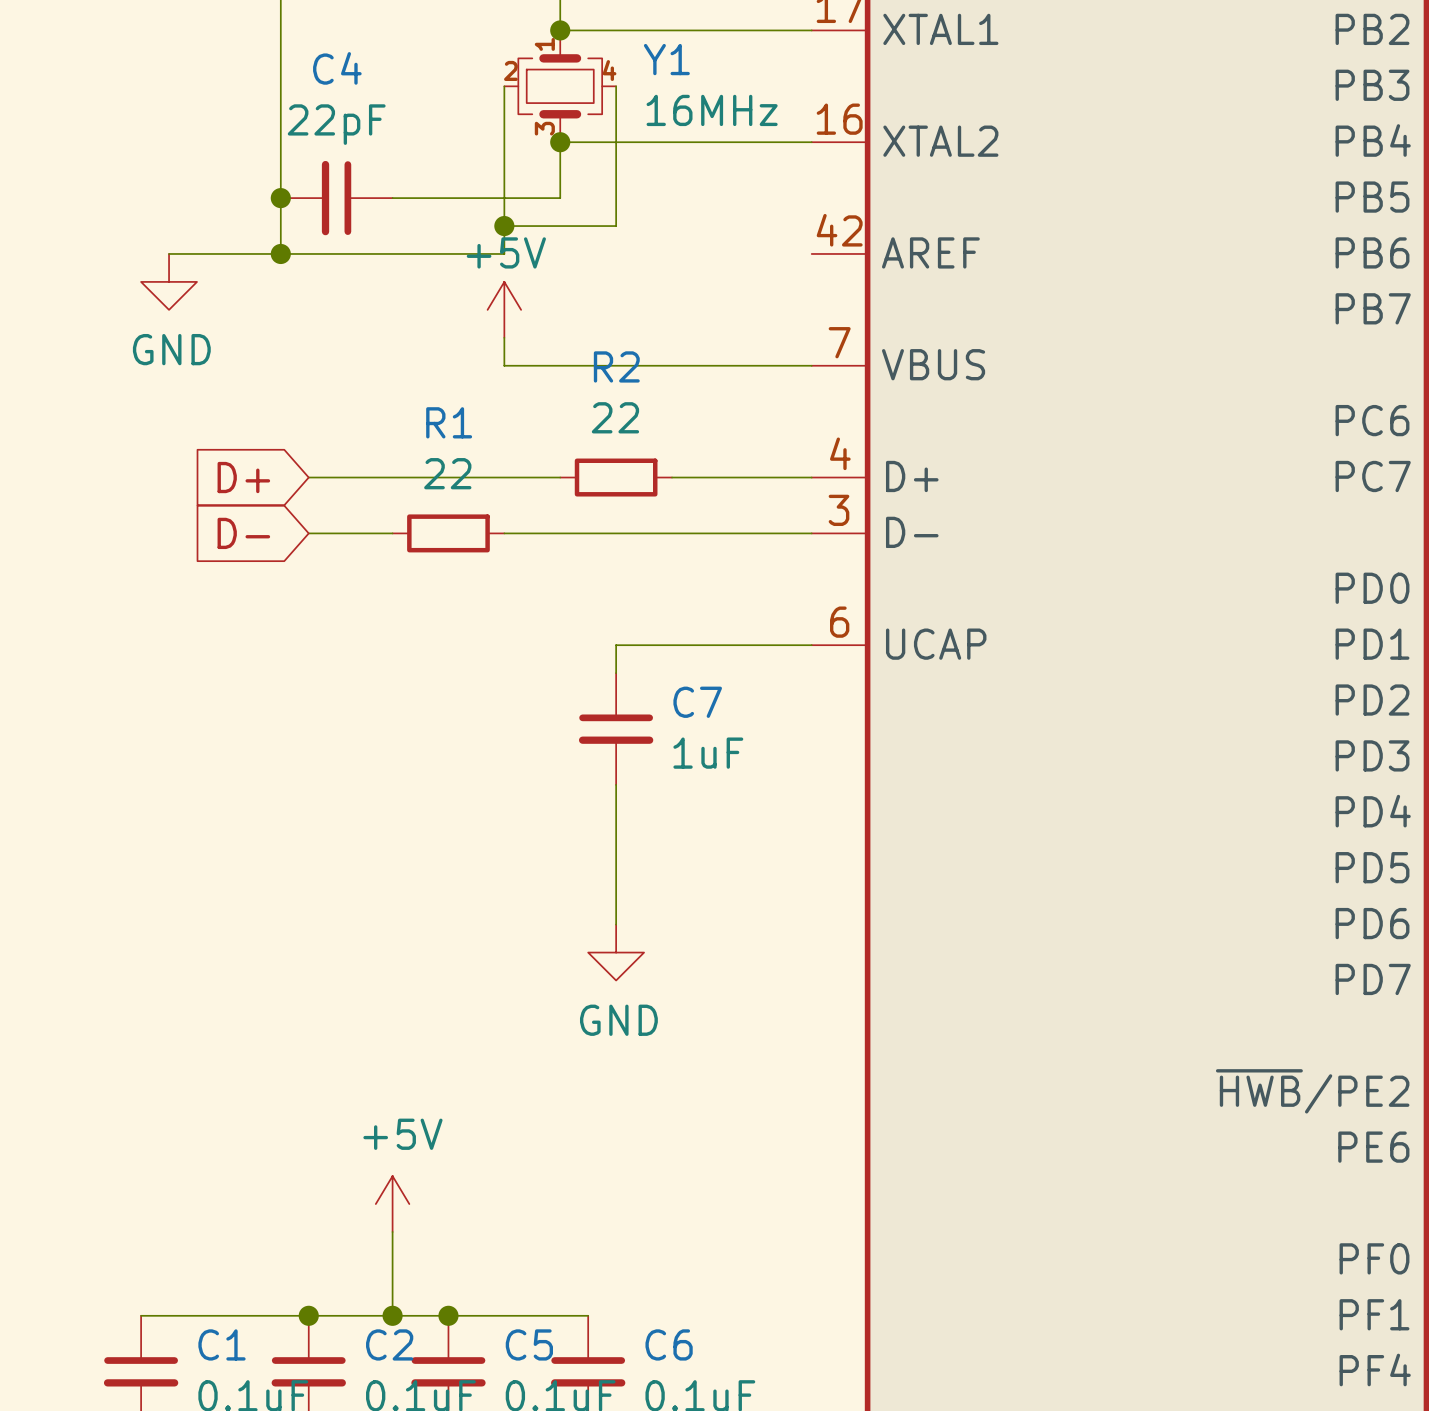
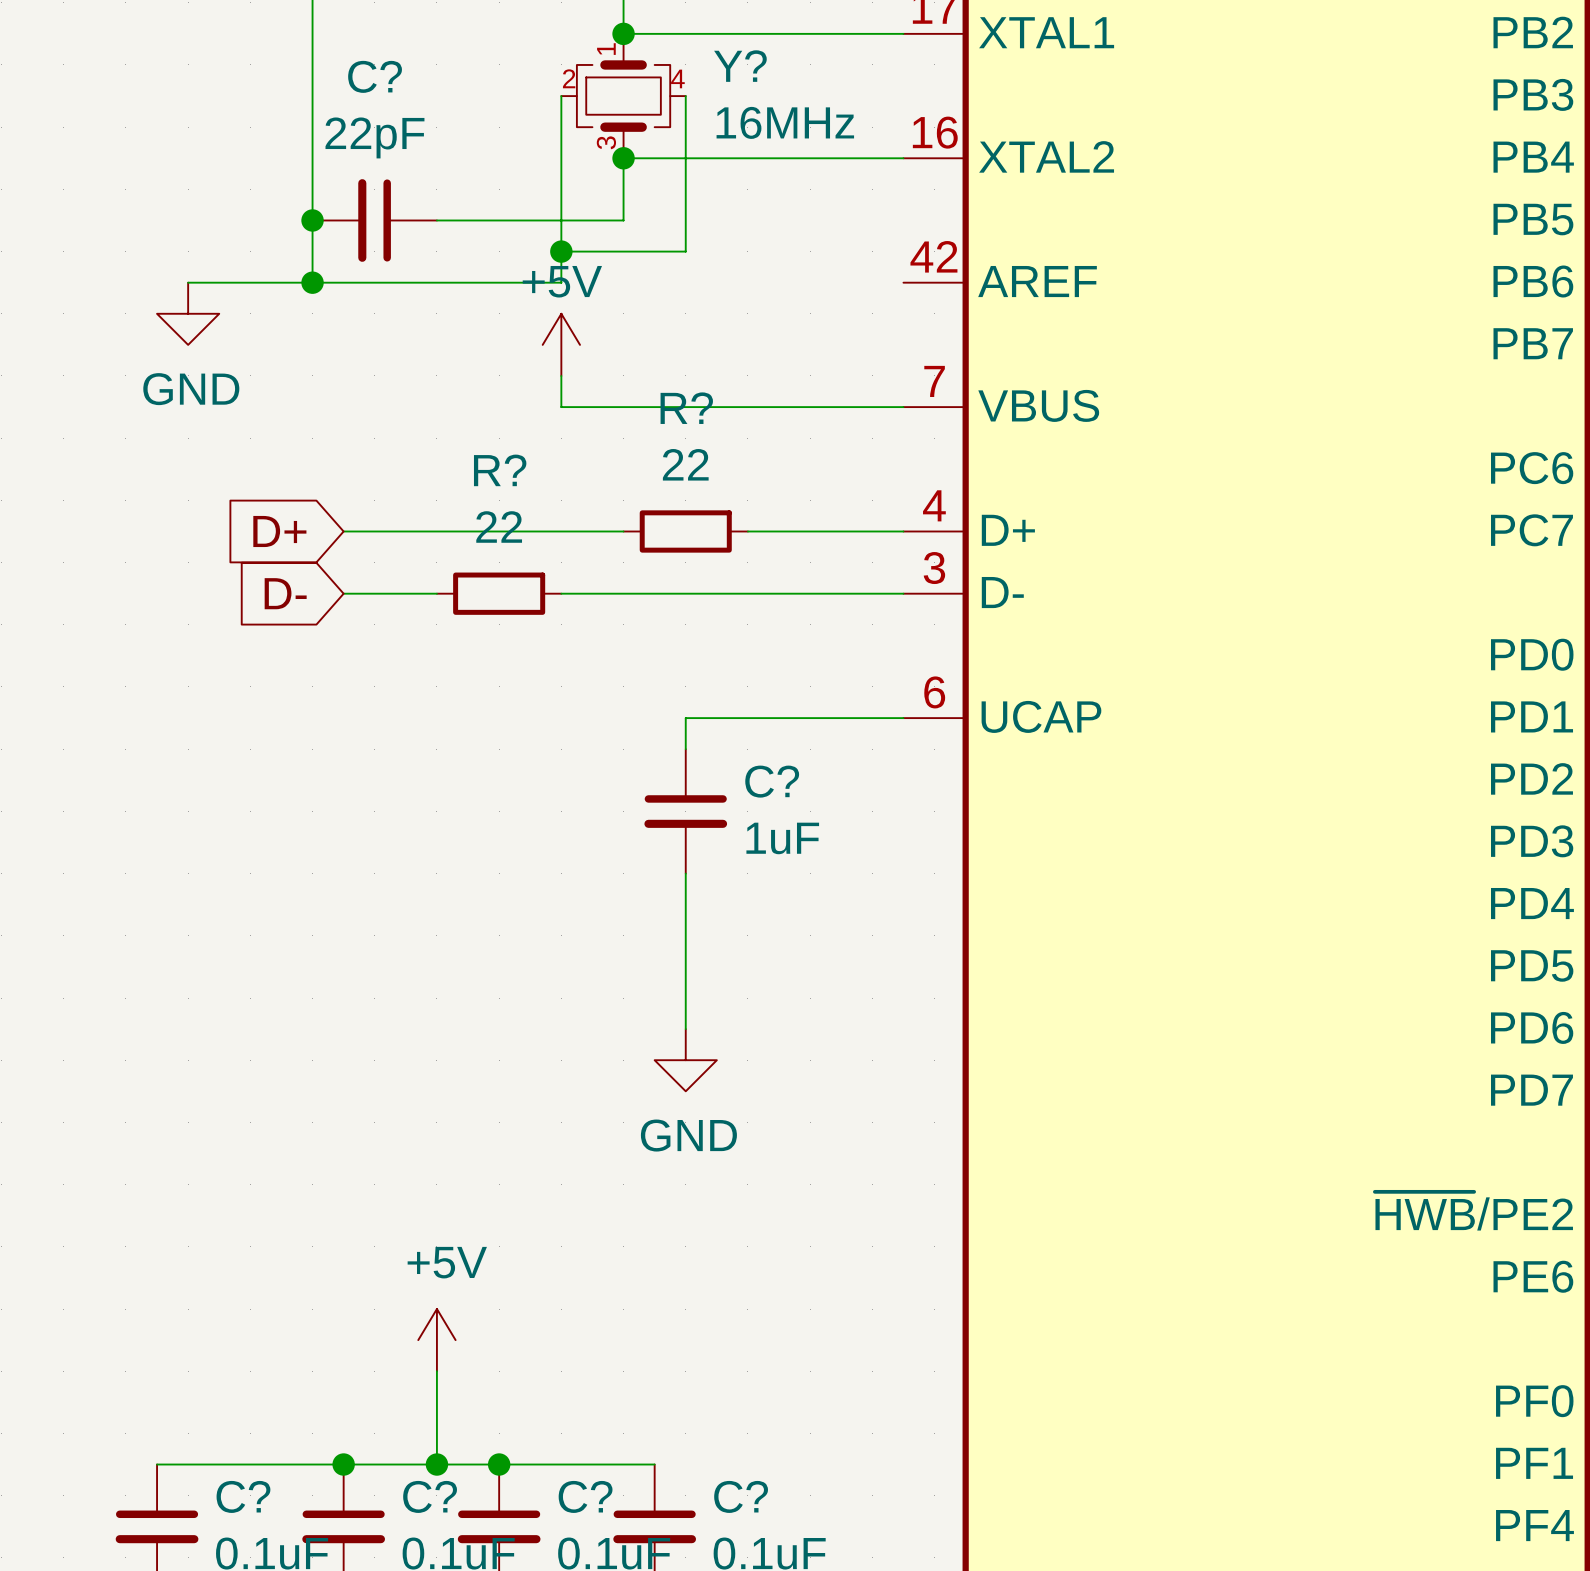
Y1 name: Y1 (666, 59) -> Y? (740, 66)
C4 name: C4 (337, 68) -> C? (375, 76)
R2 name: R2 (616, 366) -> R? (686, 408)
R1 name: R1 (449, 422) -> R? (500, 470)
C7 name: C7 (697, 702) -> C? (772, 781)
C1 name: C1 (221, 1344) -> C? (243, 1496)
C2 name: C2 (389, 1344) -> C? (430, 1496)
C5 name: C5 (529, 1344) -> C? (585, 1496)
C6 name: C6 (669, 1344) -> C? (741, 1496)

